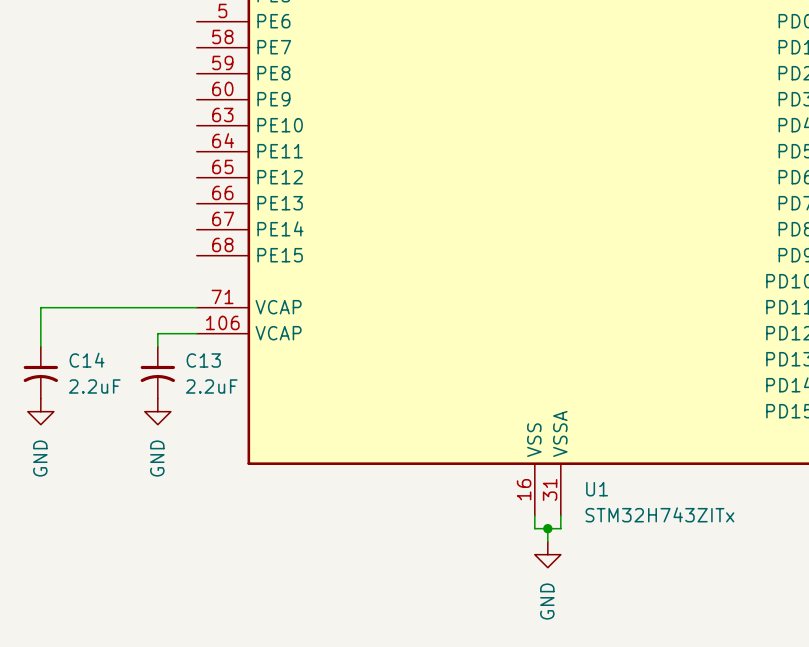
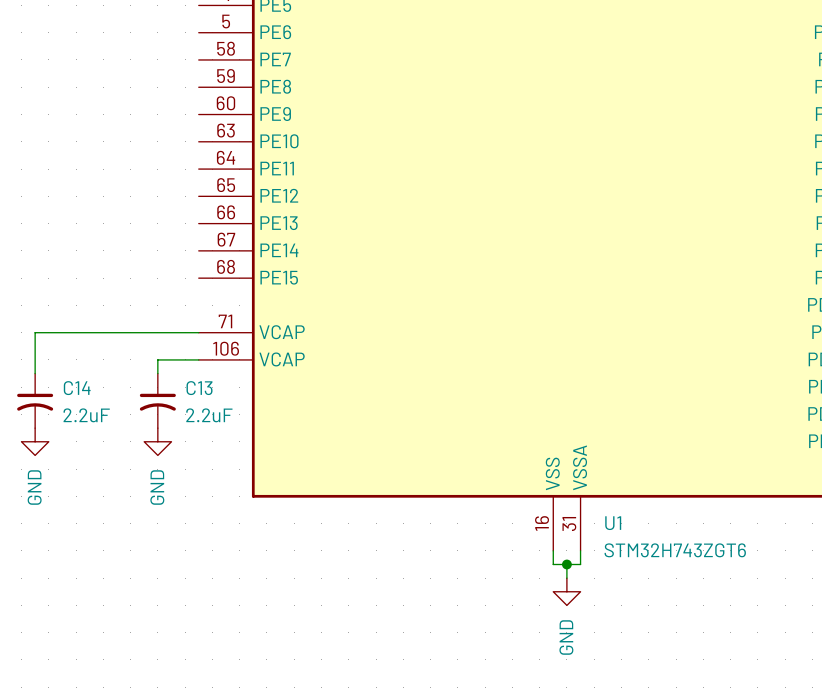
U1 value: STM32H743ZITx (659, 514) -> STM32H743ZGT6 (675, 550)

